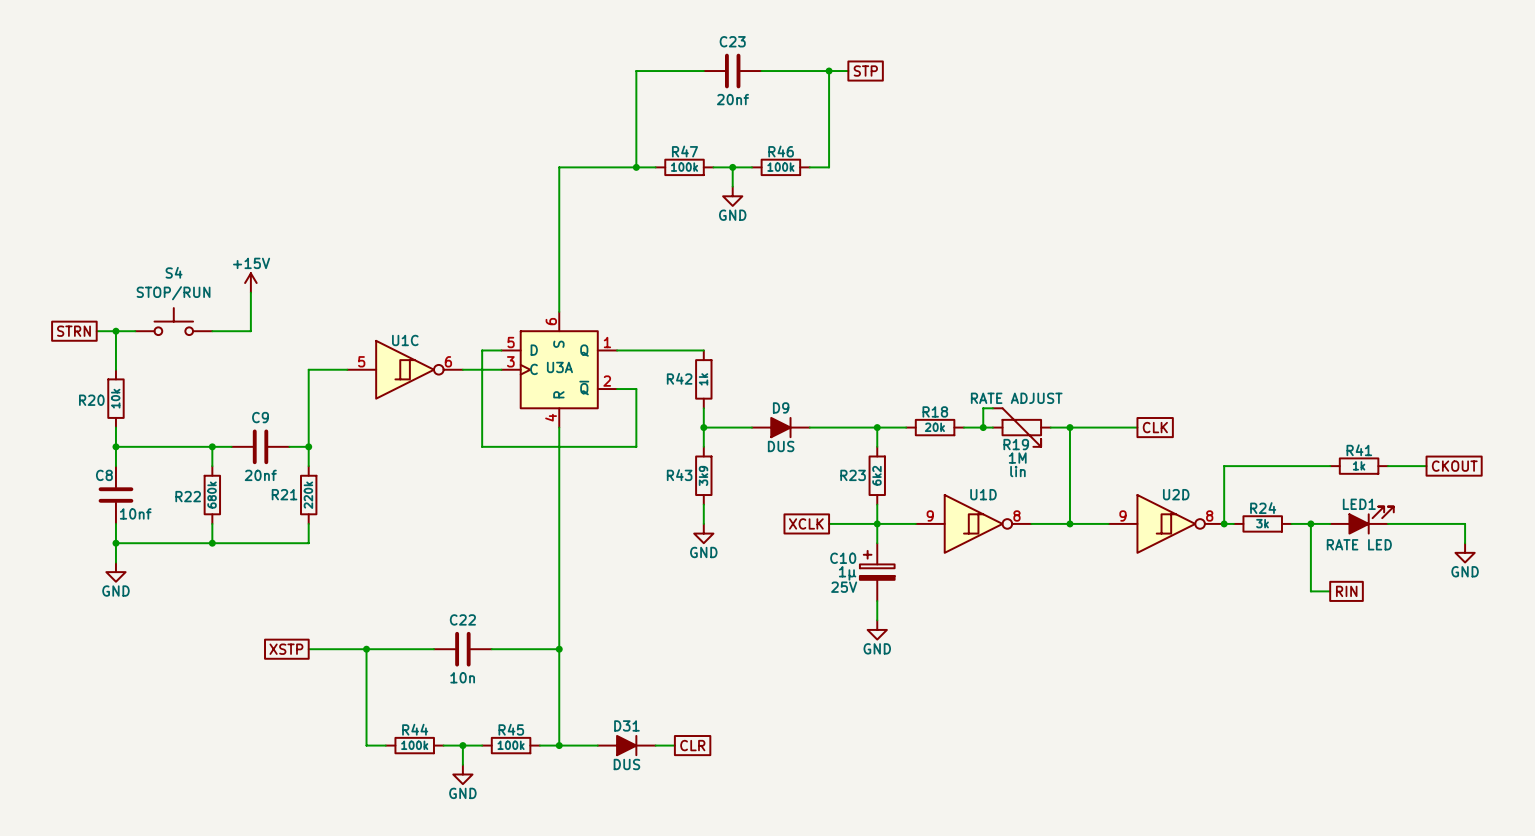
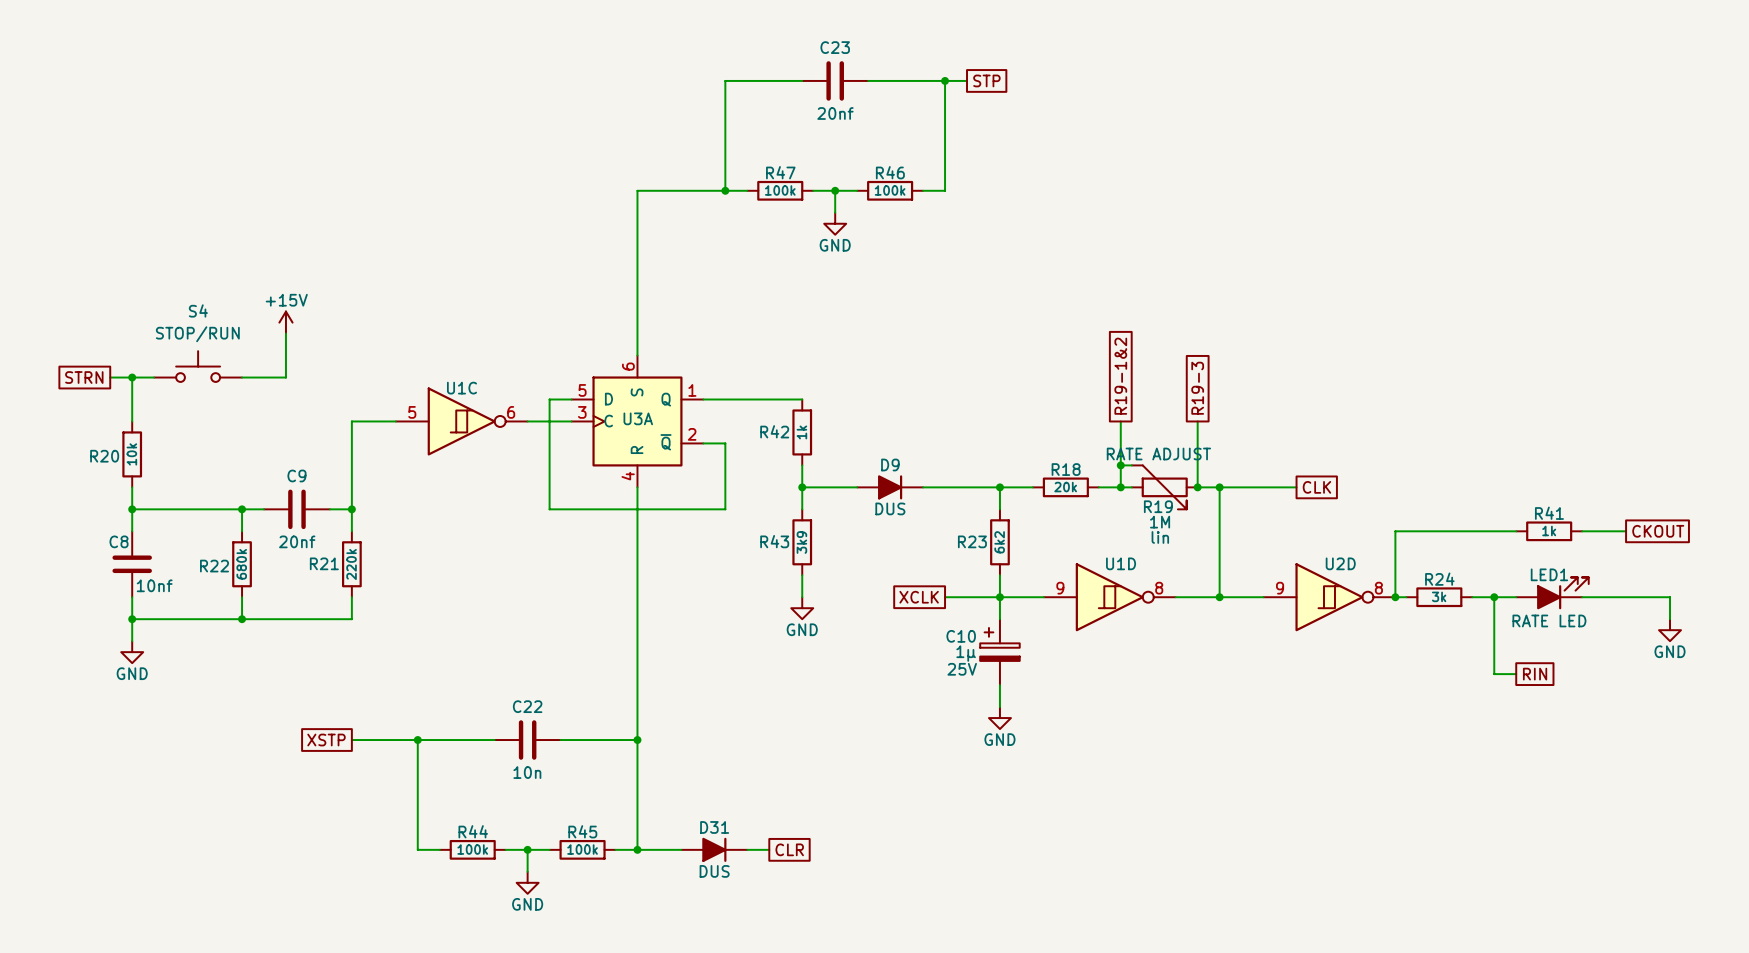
global label: none -> R19-1&2 (1120, 376)
global label: none -> R19-3 (1197, 388)
wire: none -> (1120, 421) (1120, 465)
wire: none -> (1197, 421) (1197, 487)
junction: none -> (1120, 465)
junction: none -> (1197, 487)

